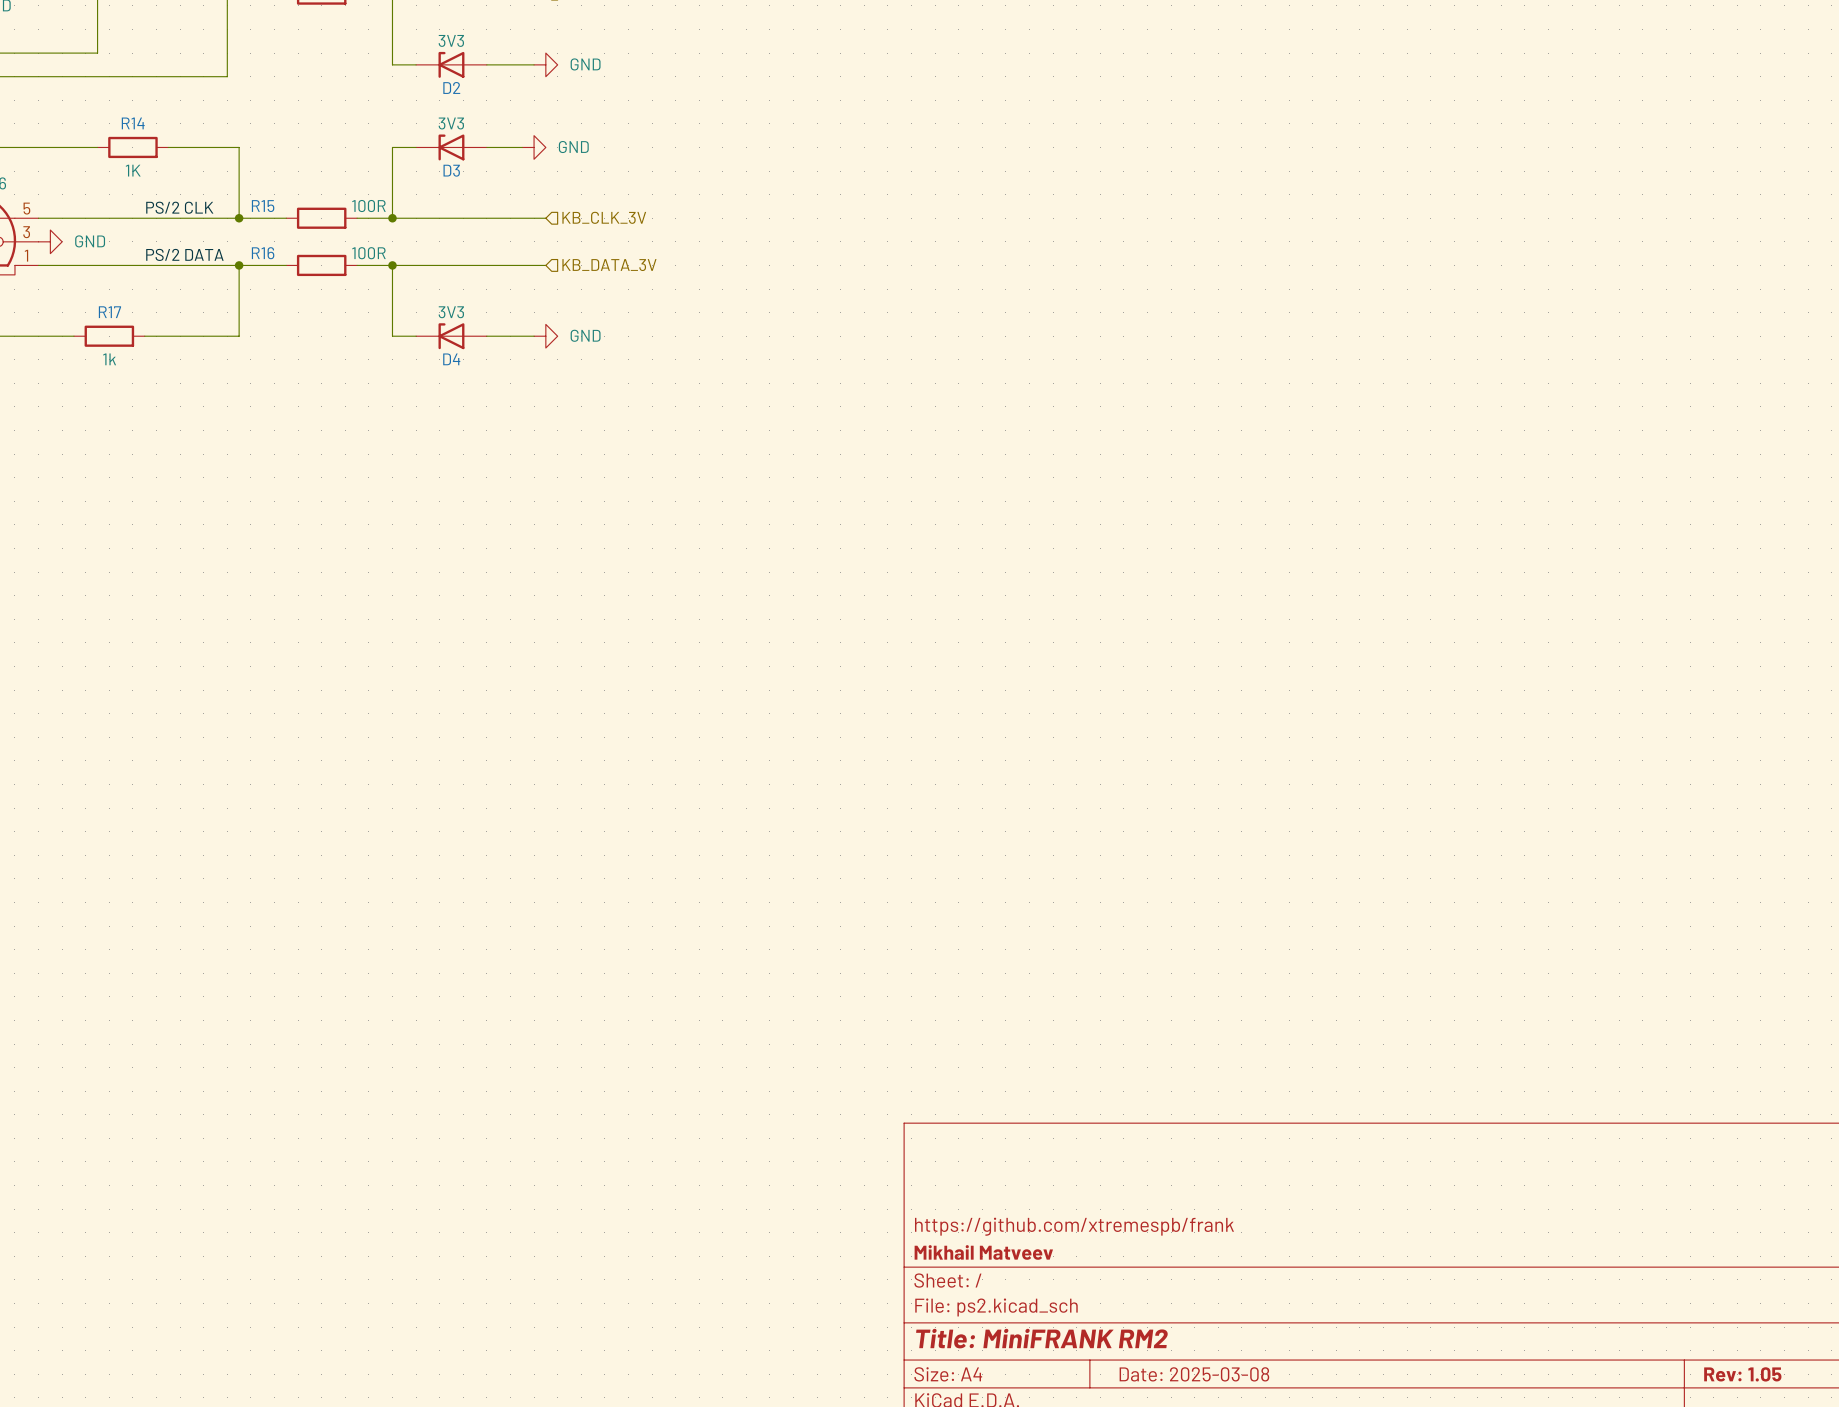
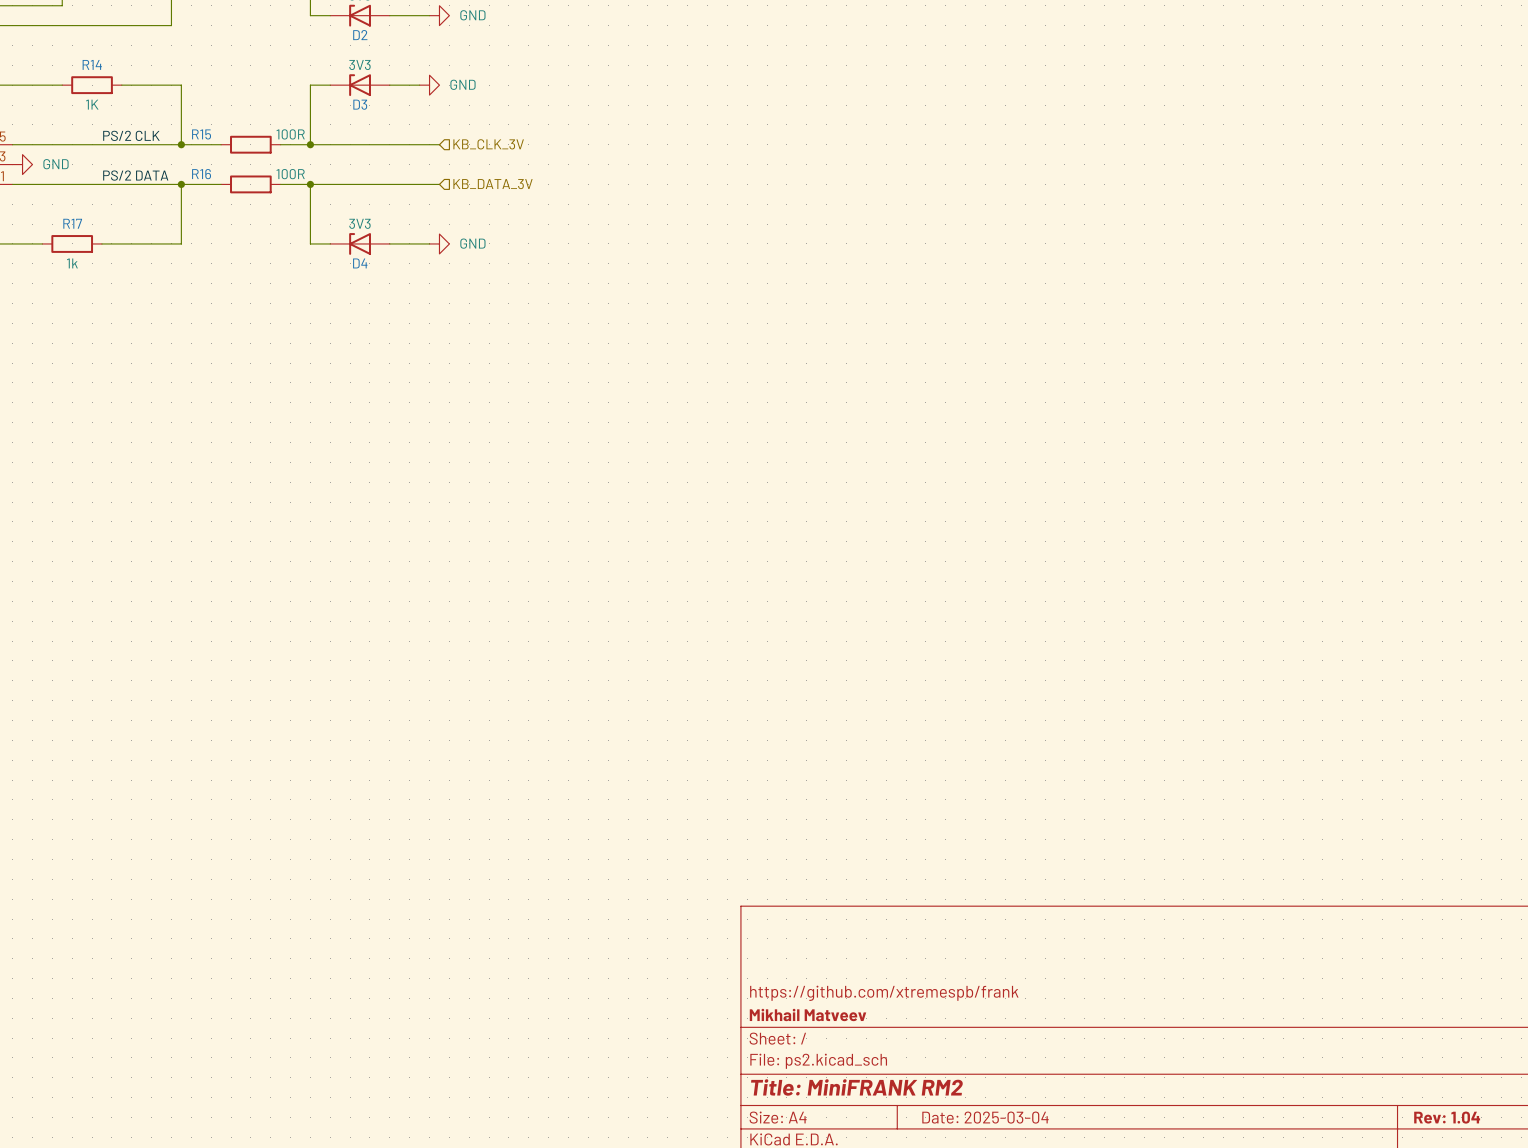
title block: Date: 2025-03-08 (1194, 1374) -> Date: 2025-03-04 (985, 1117)
title block: Rev: 1.05 (1742, 1374) -> Rev: 1.04 (1447, 1117)

